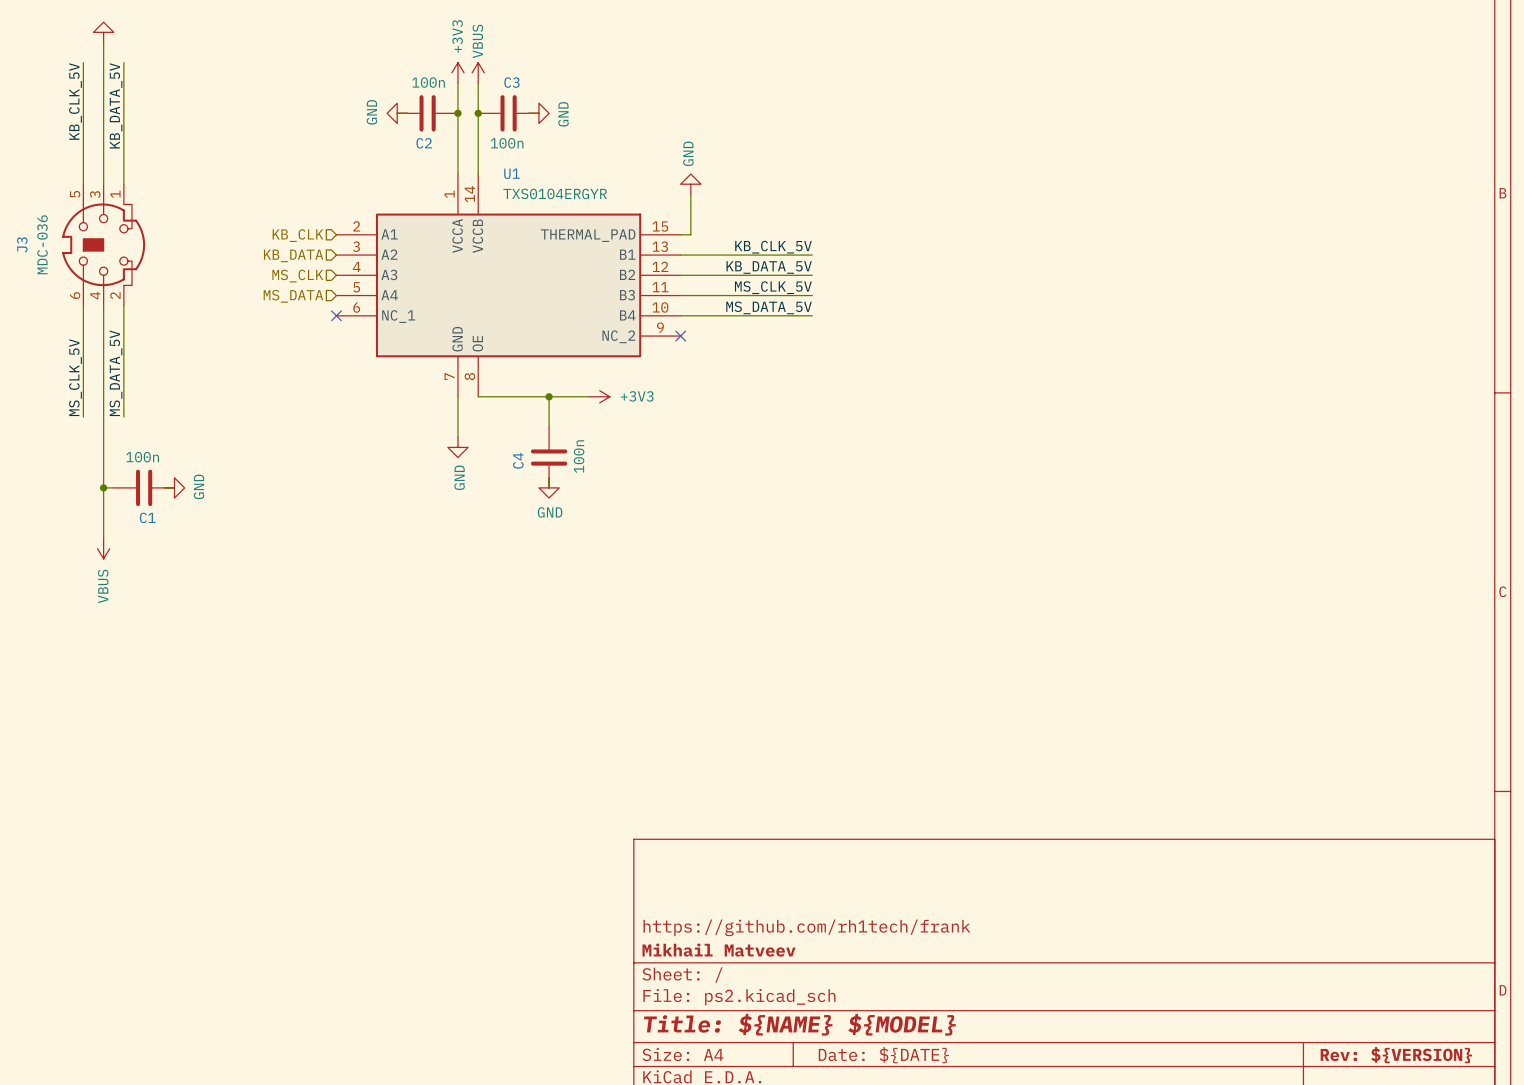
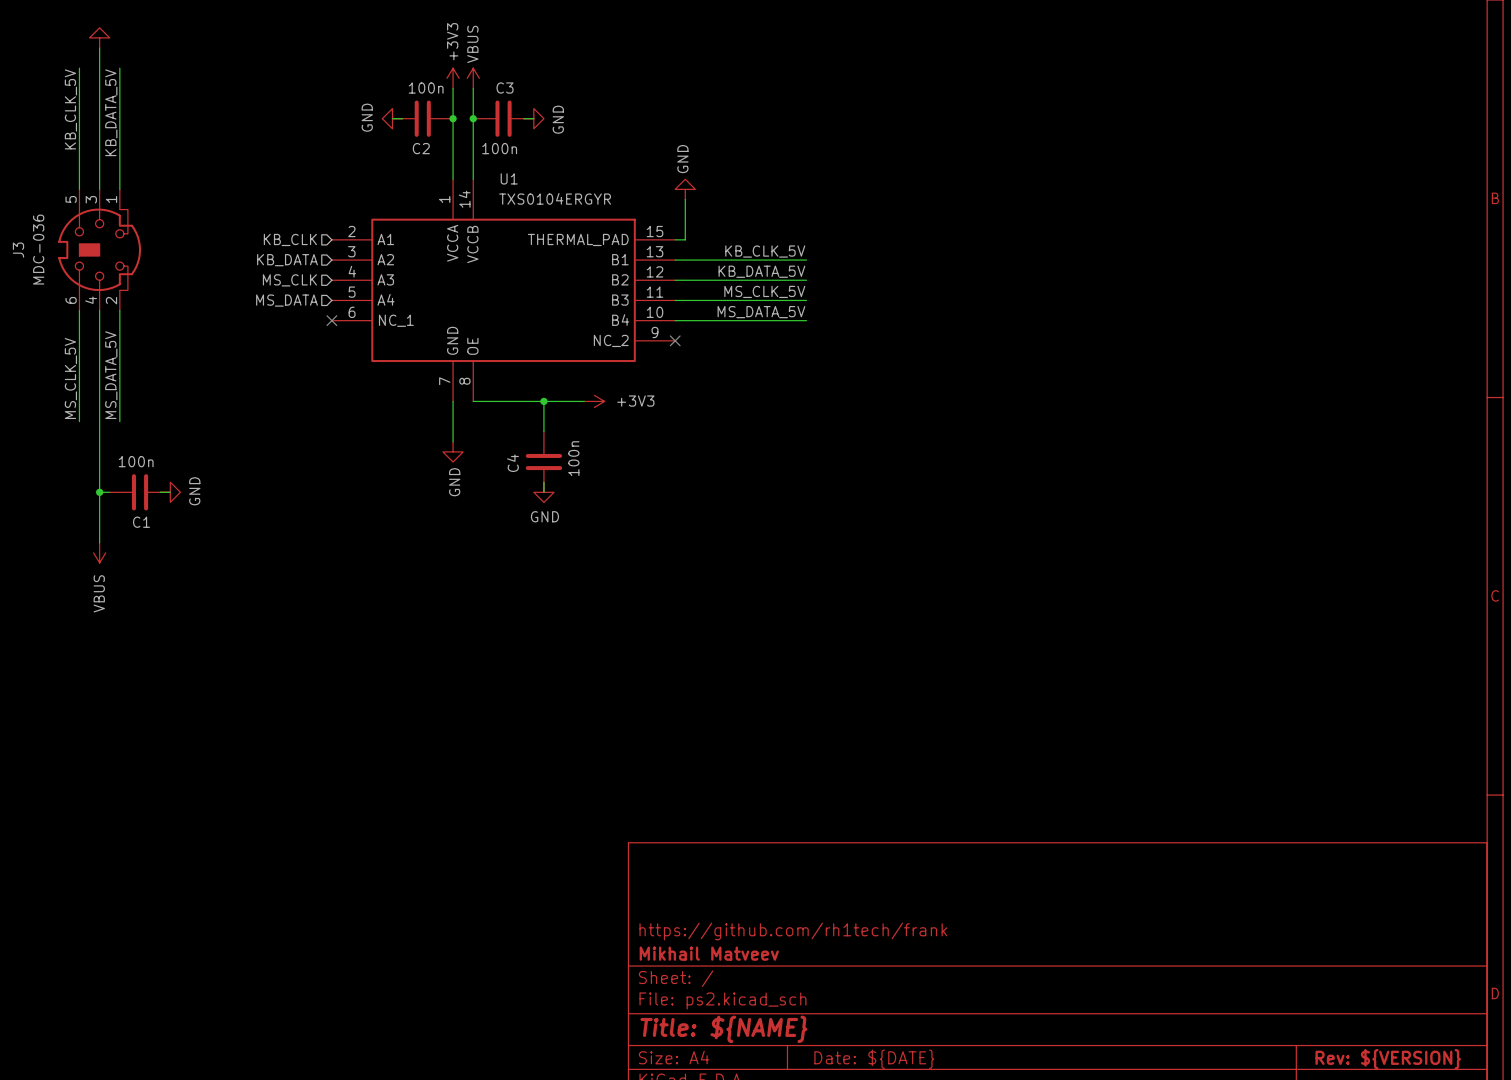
title block: Title: ${NAME} ${MODEL} (799, 1024) -> Title: ${NAME} (723, 1029)

